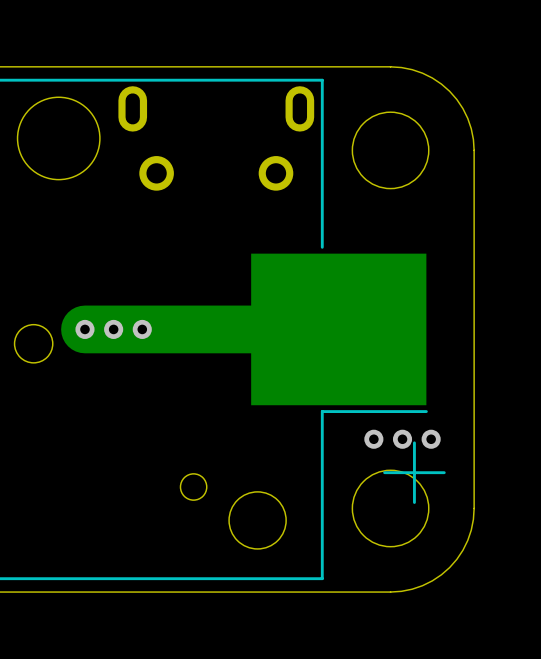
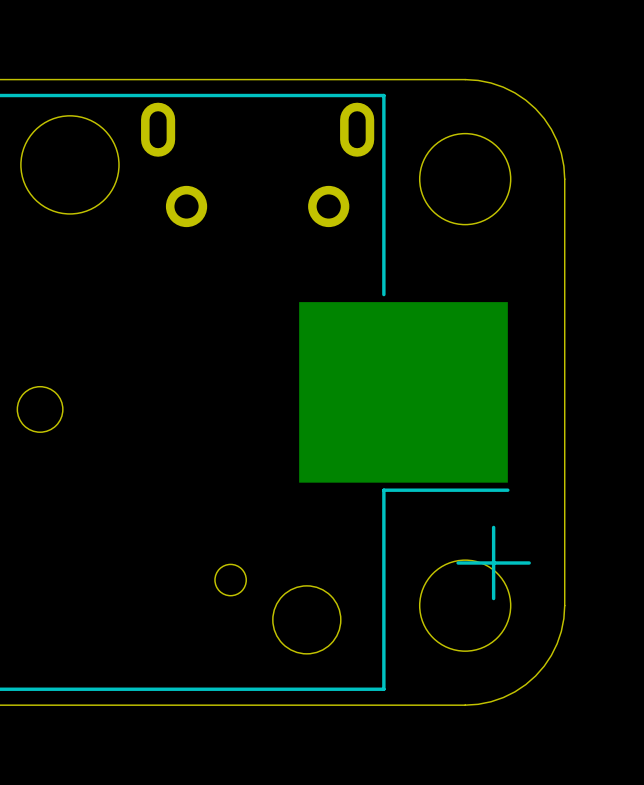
via: (84, 329) -> none
via: (113, 329) -> none
via: (142, 329) -> none
track: (338, 329) (84, 329) -> none
via: (373, 439) -> none
via: (402, 439) -> none
via: (431, 439) -> none

